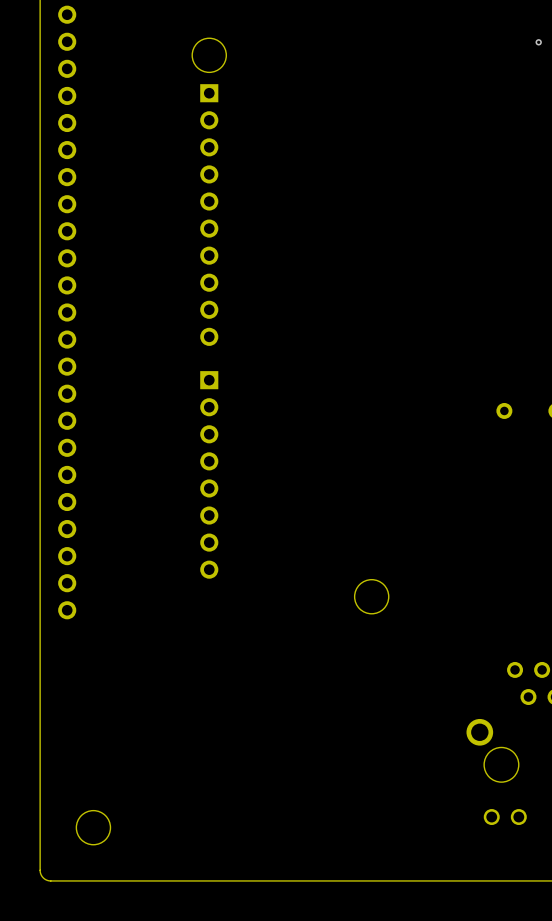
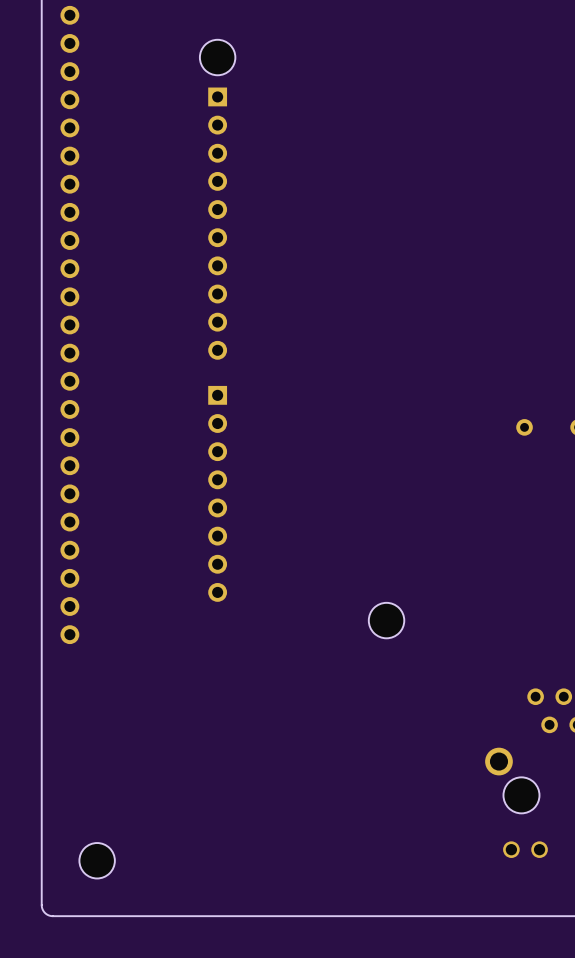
via: (538, 42) -> none

